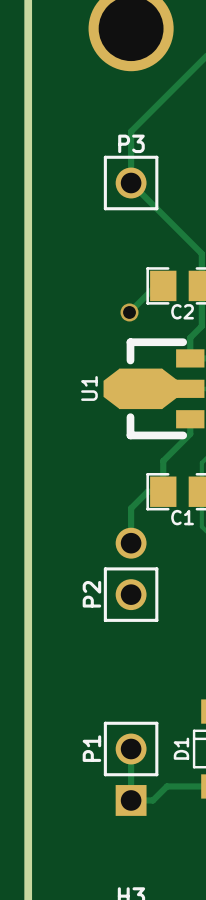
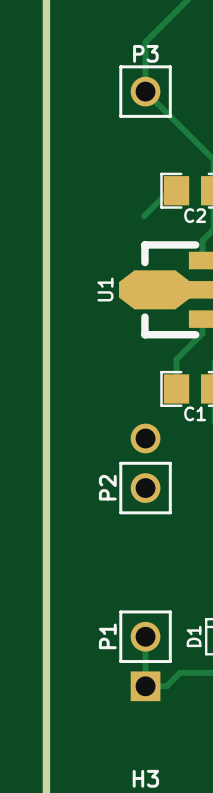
via: (129, 312) -> none
track: (163, 491) (147, 491) (131, 508) (131, 543) -> none

